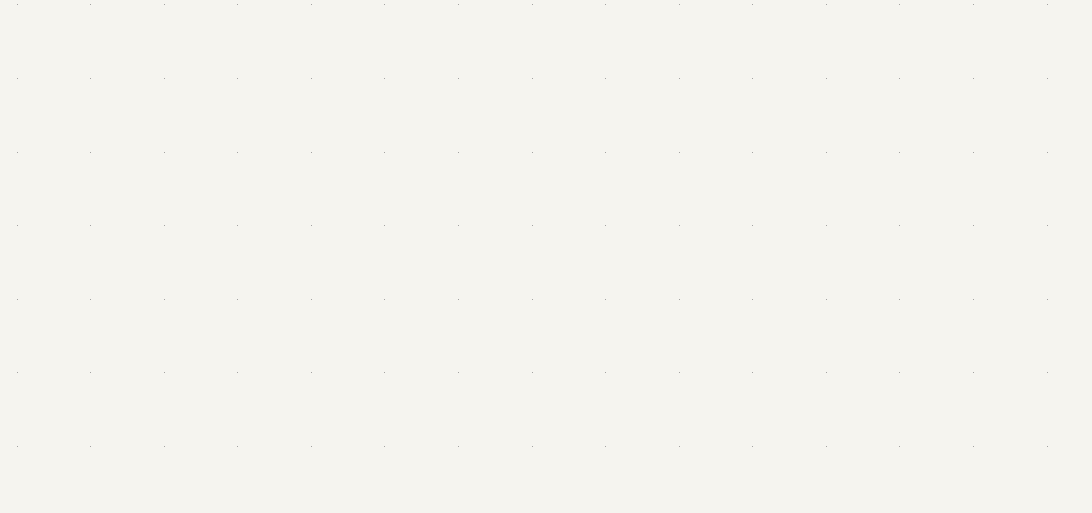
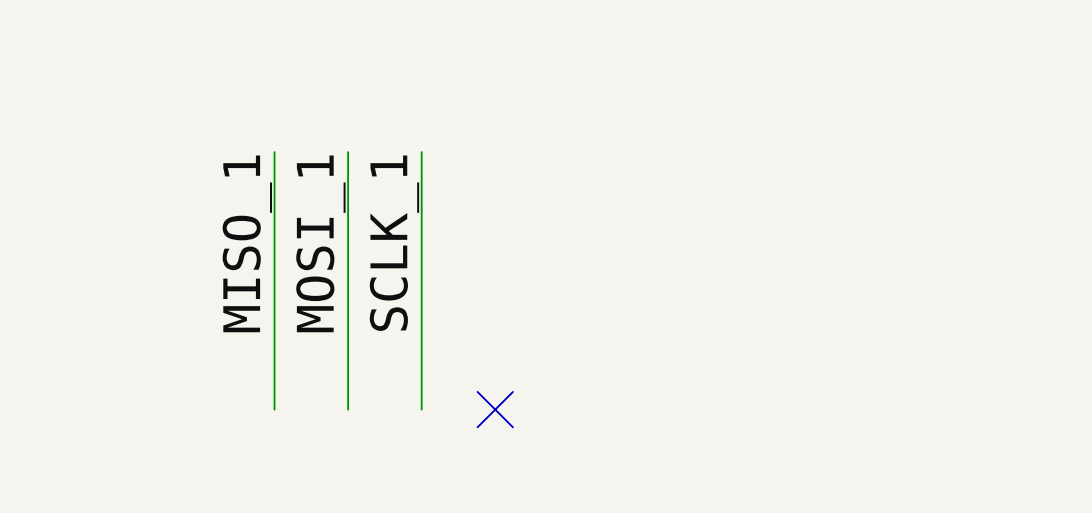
wire: none -> (274, 152) (274, 409)
wire: none -> (348, 152) (348, 409)
wire: none -> (421, 152) (421, 409)
label: none -> MISO_1 (247, 243)
label: none -> MOSI_1 (320, 243)
label: none -> SCLK_1 (394, 243)
no-connect mark: none -> (495, 409)

